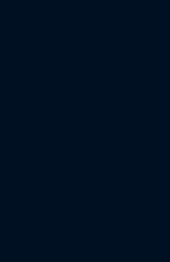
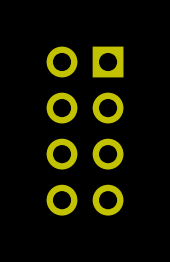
part: none -> (85, 131)

